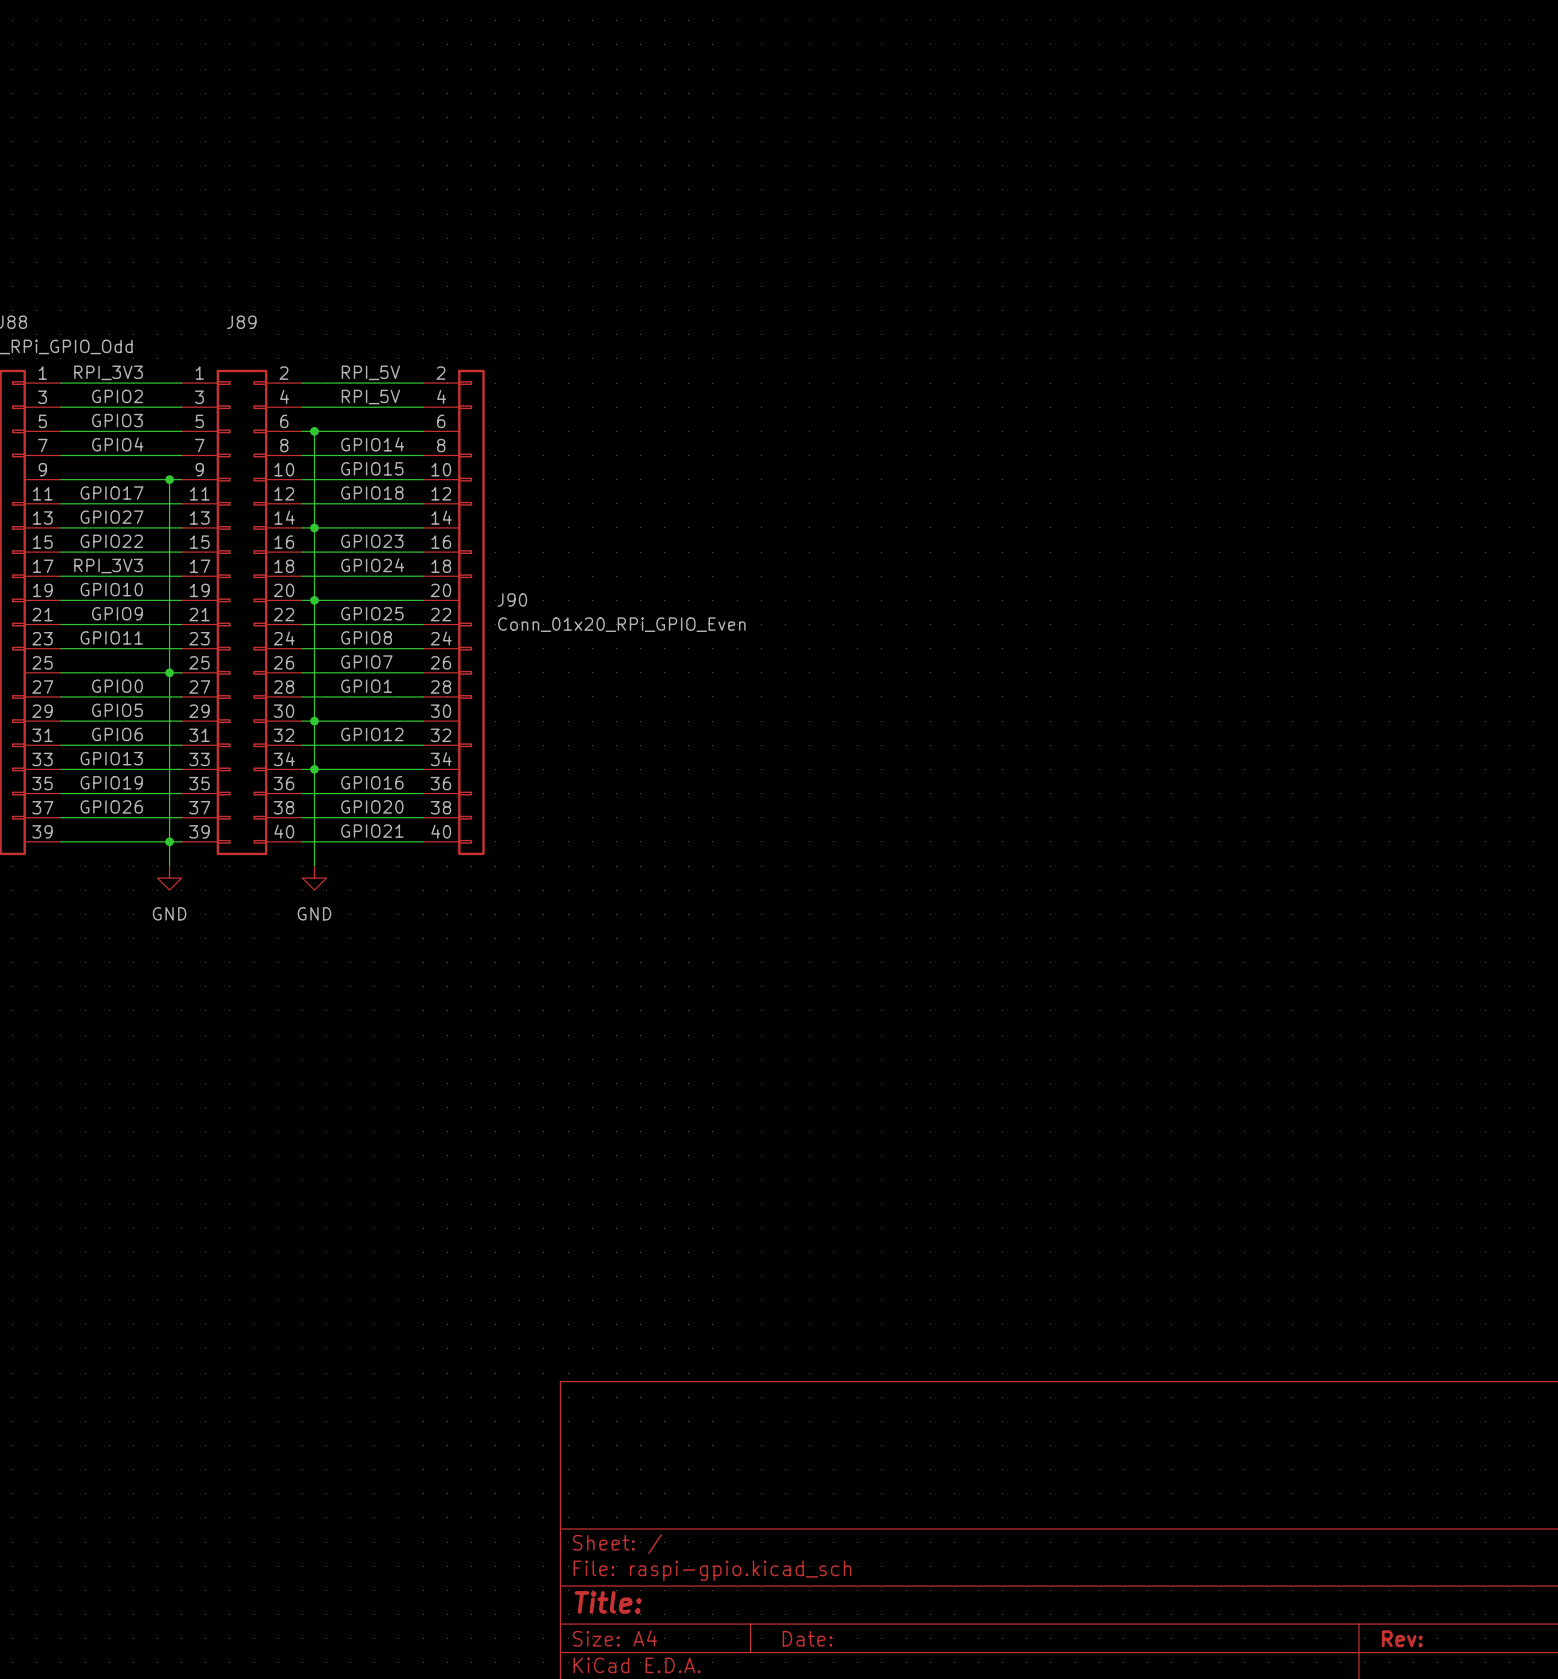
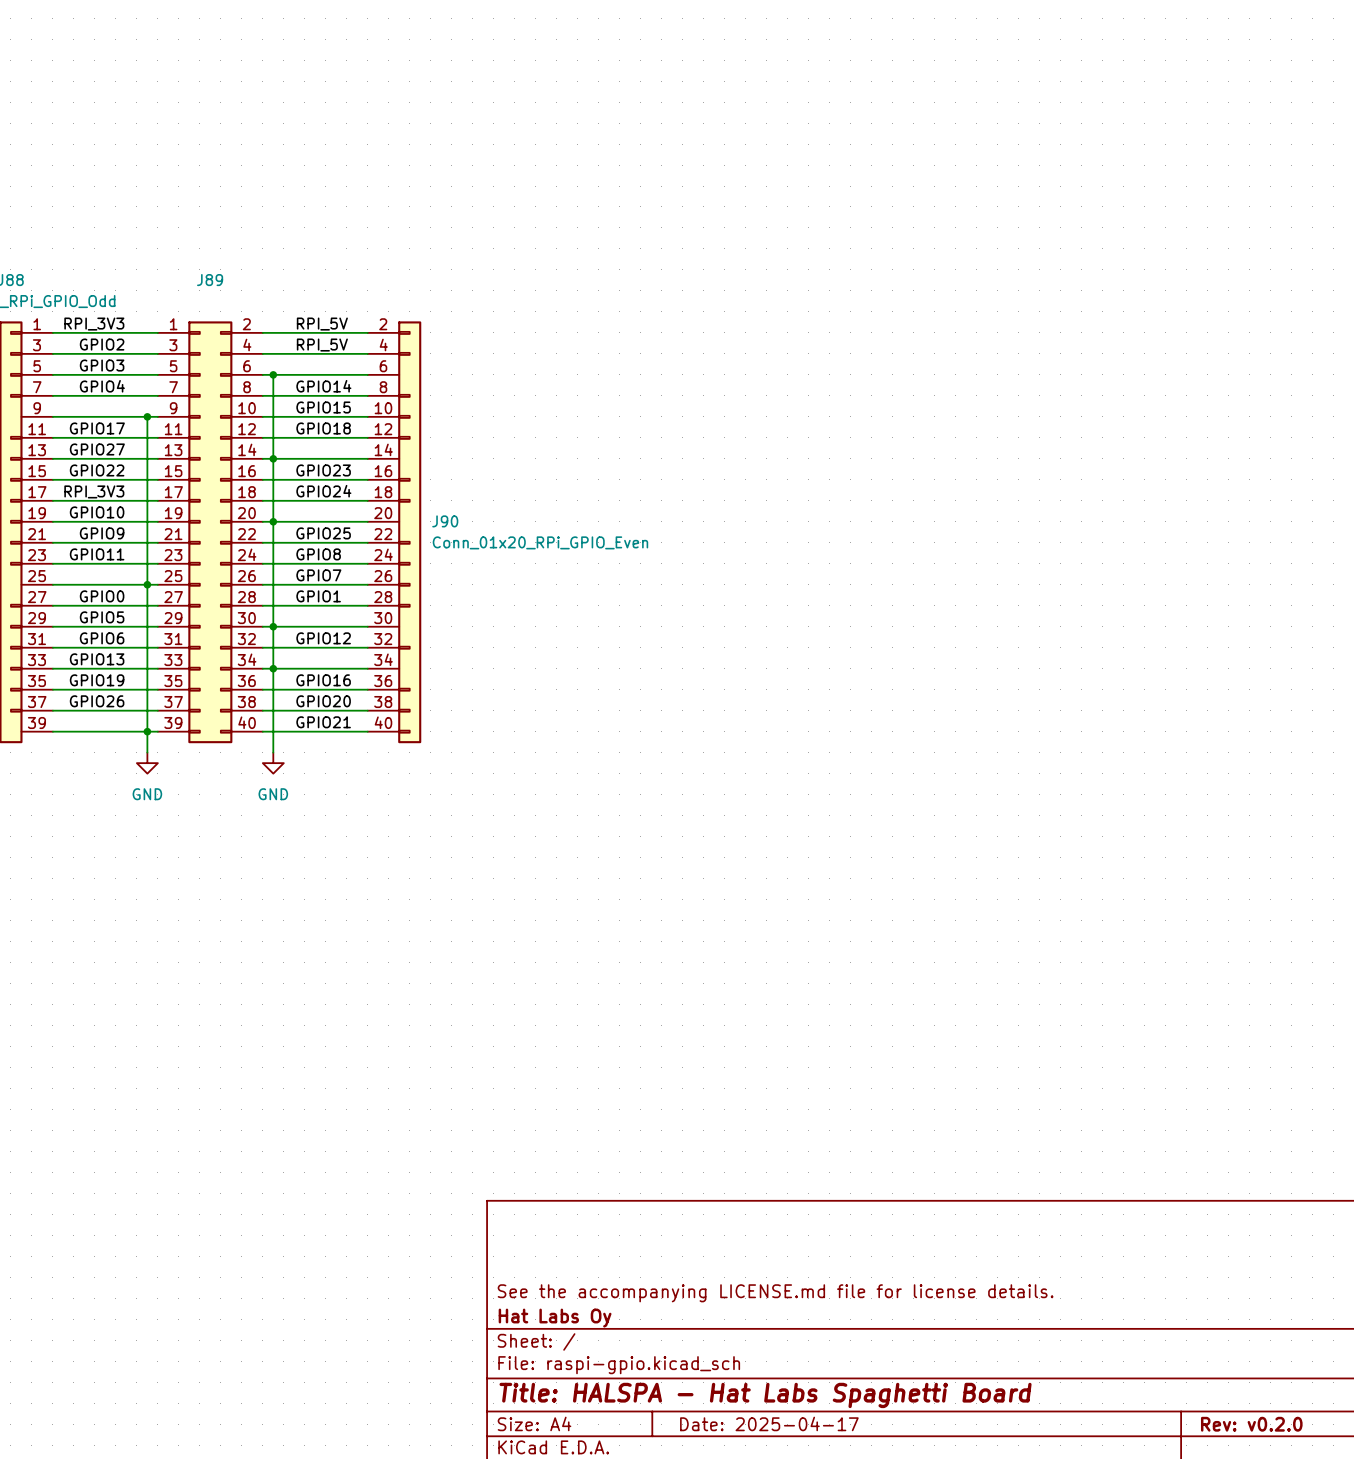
title block: none -> See the accompanying LICENSE.md file for license details. (775, 1293)
title block: none -> Hat Labs Oy (555, 1318)
title block: Title: (608, 1602) -> Title: HALSPA - Hat Labs Spaghetti Board (765, 1395)
title block: Date: (807, 1638) -> Date: 2025-04-17 (769, 1423)
title block: Rev: (1402, 1638) -> Rev: v0.2.0 (1251, 1424)

